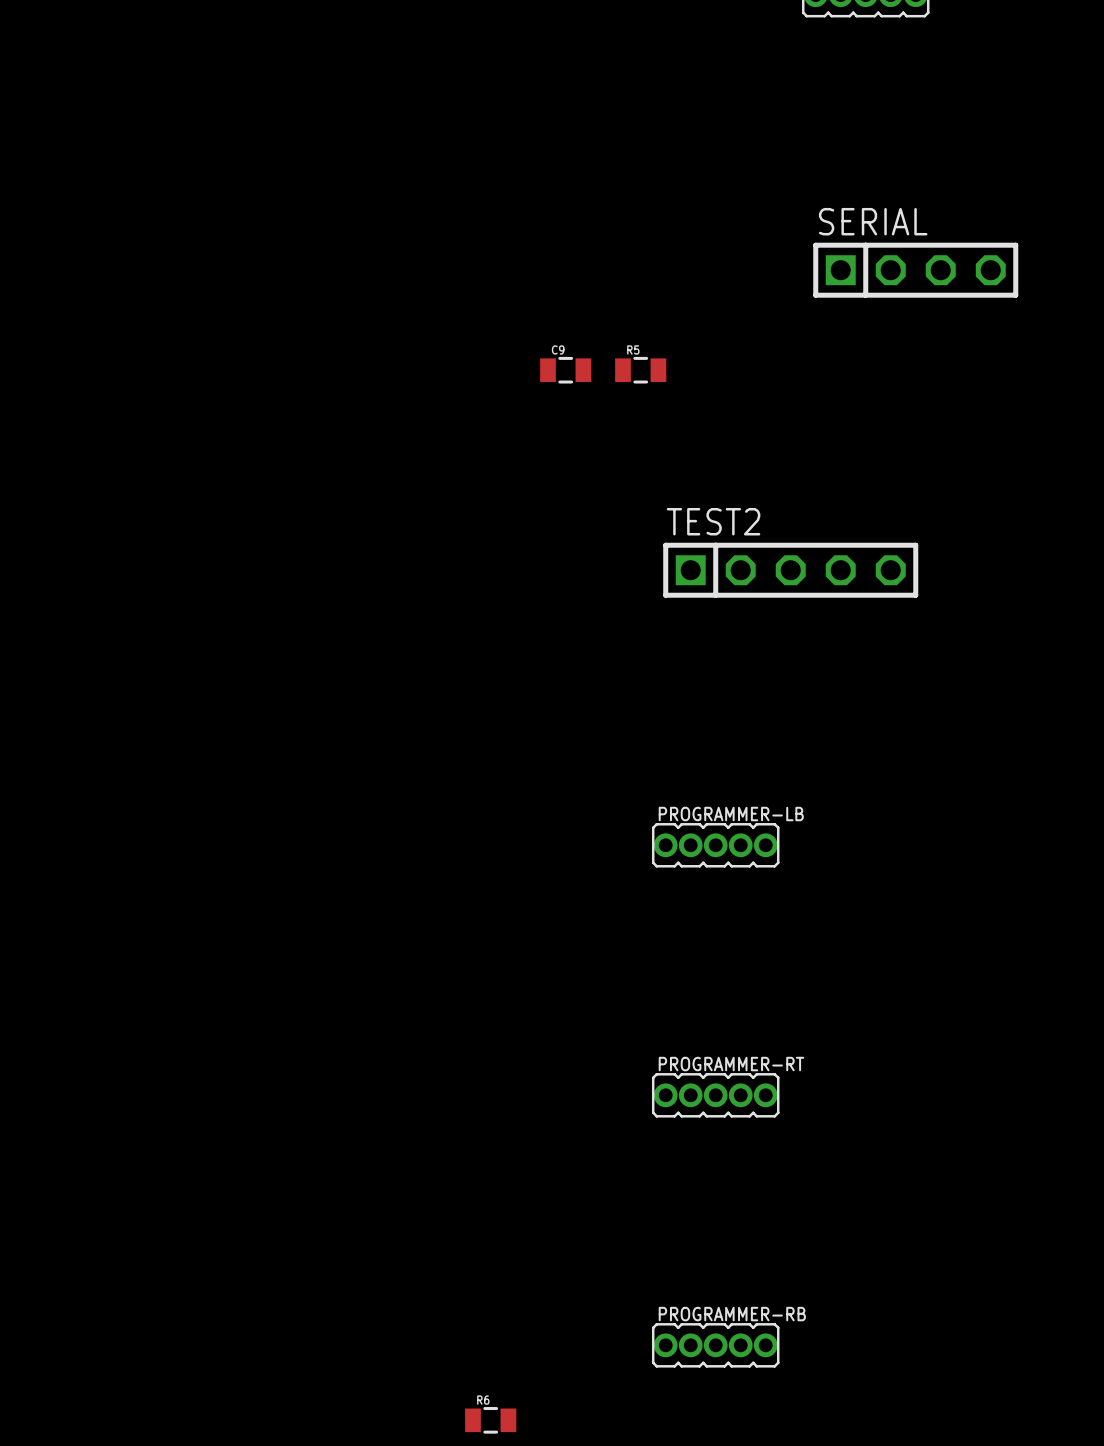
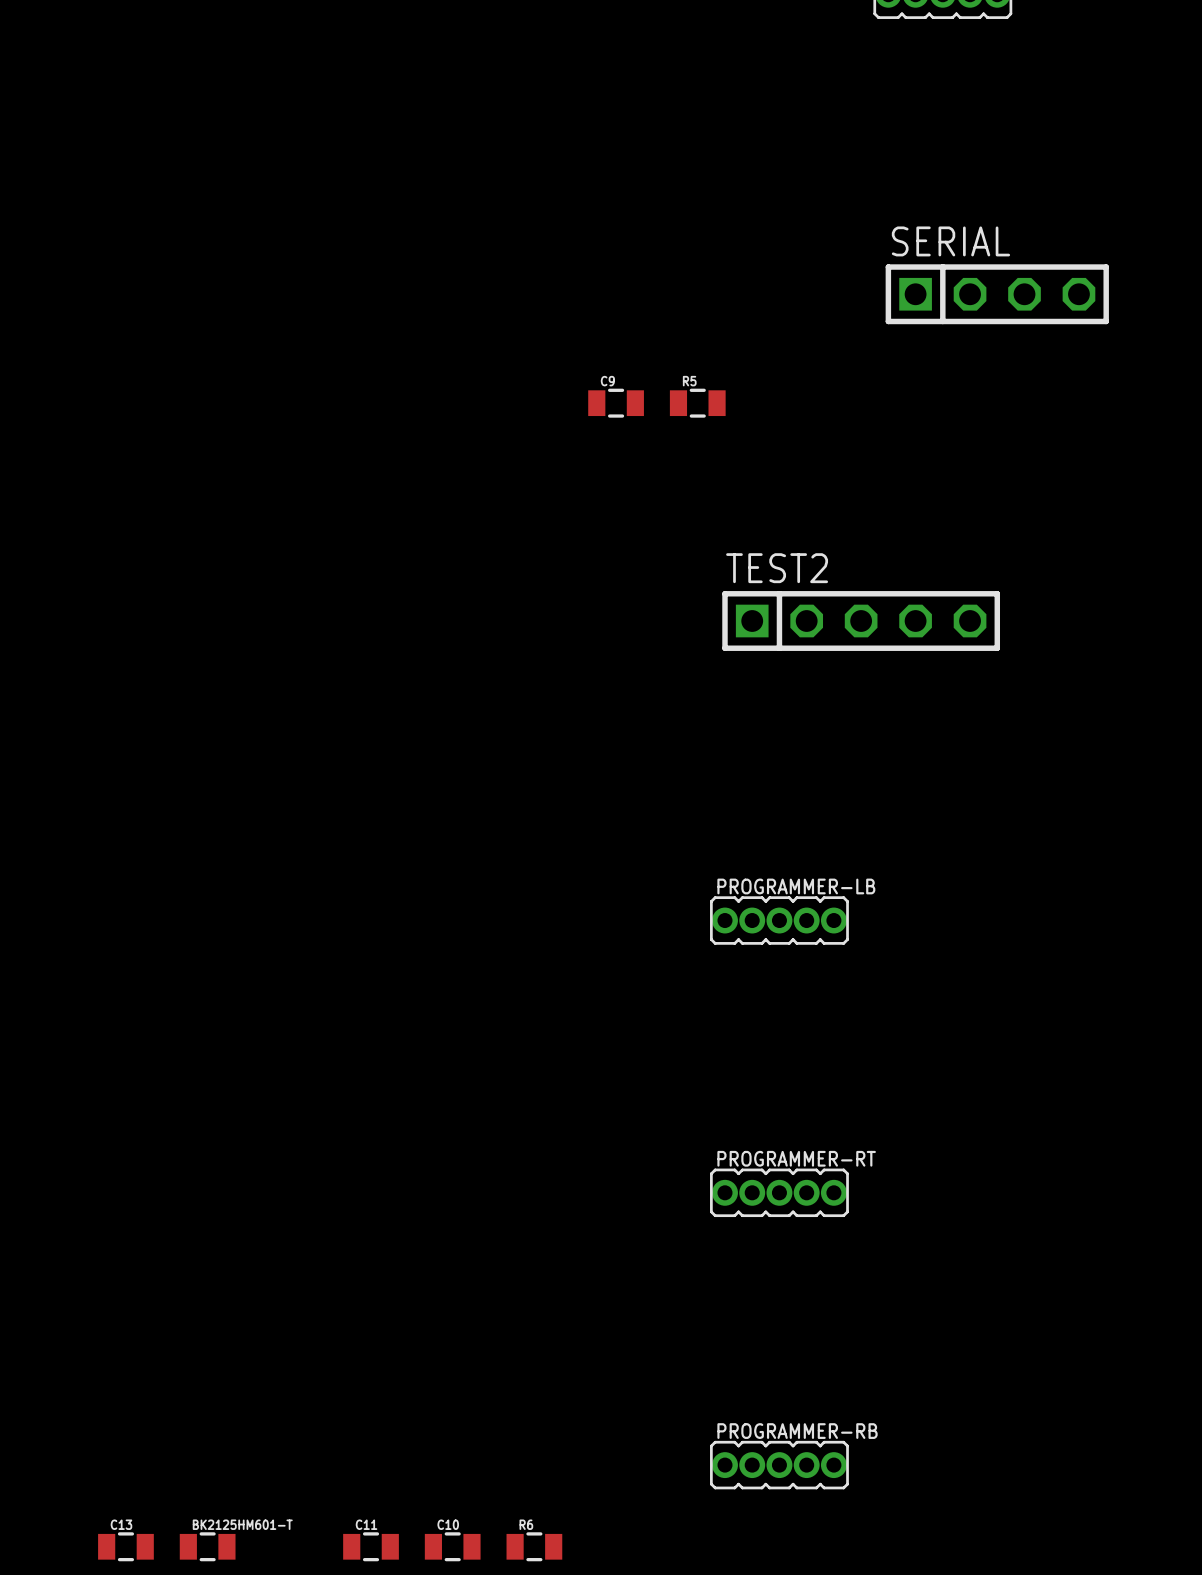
C13: none -> (125, 1546)
BK2125HM601-T: none -> (207, 1546)
C11: none -> (371, 1546)
C10: none -> (452, 1546)

